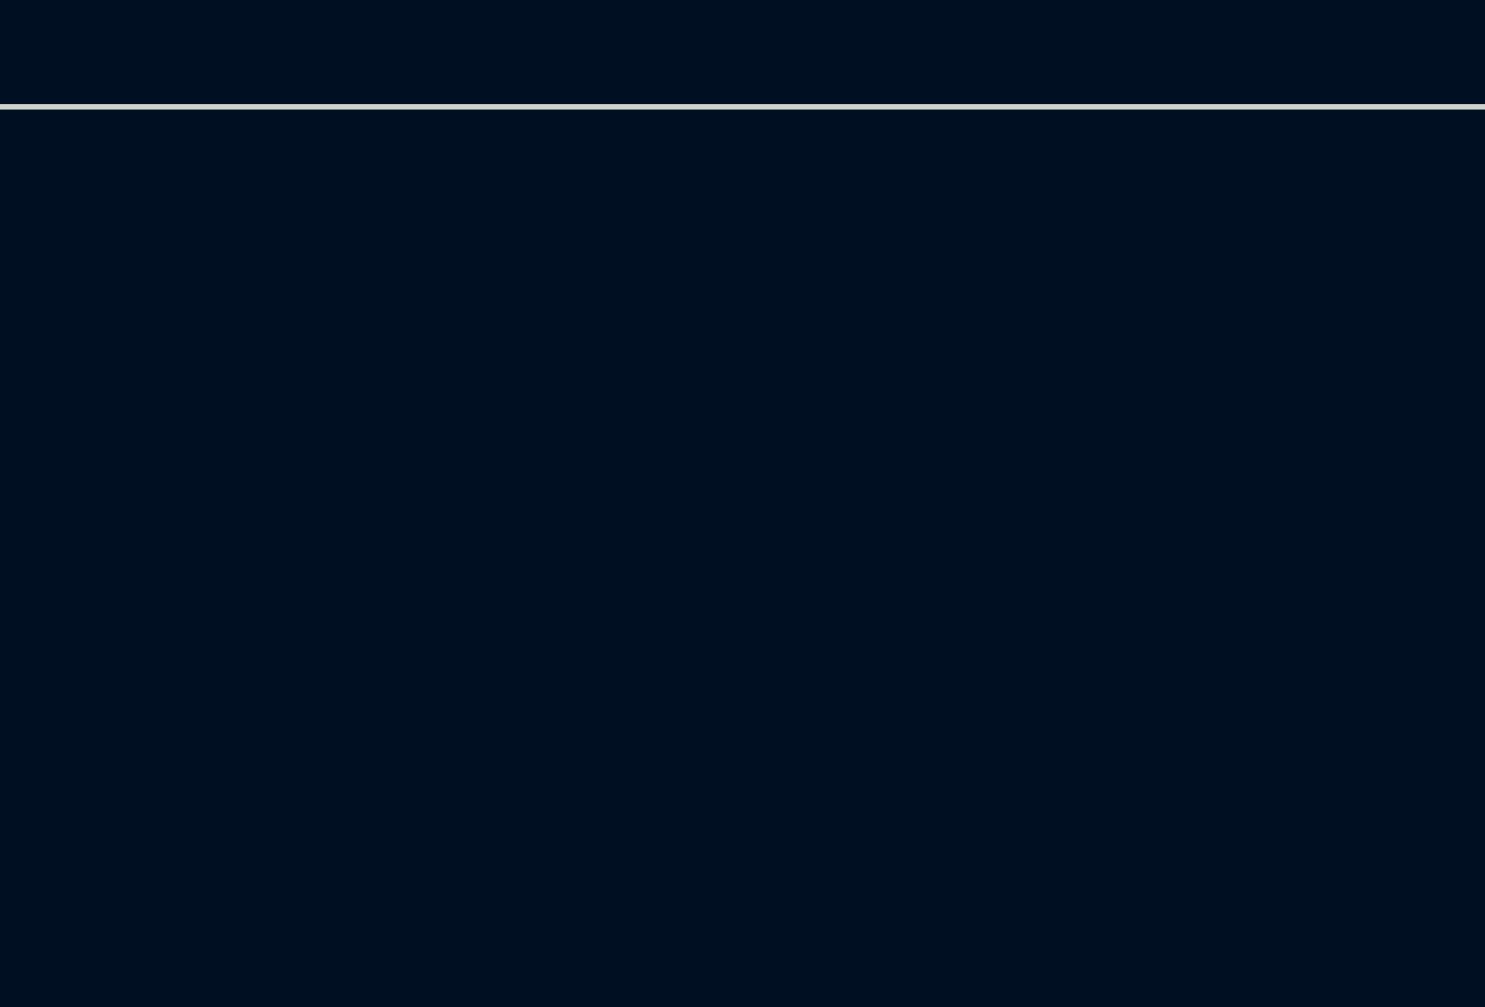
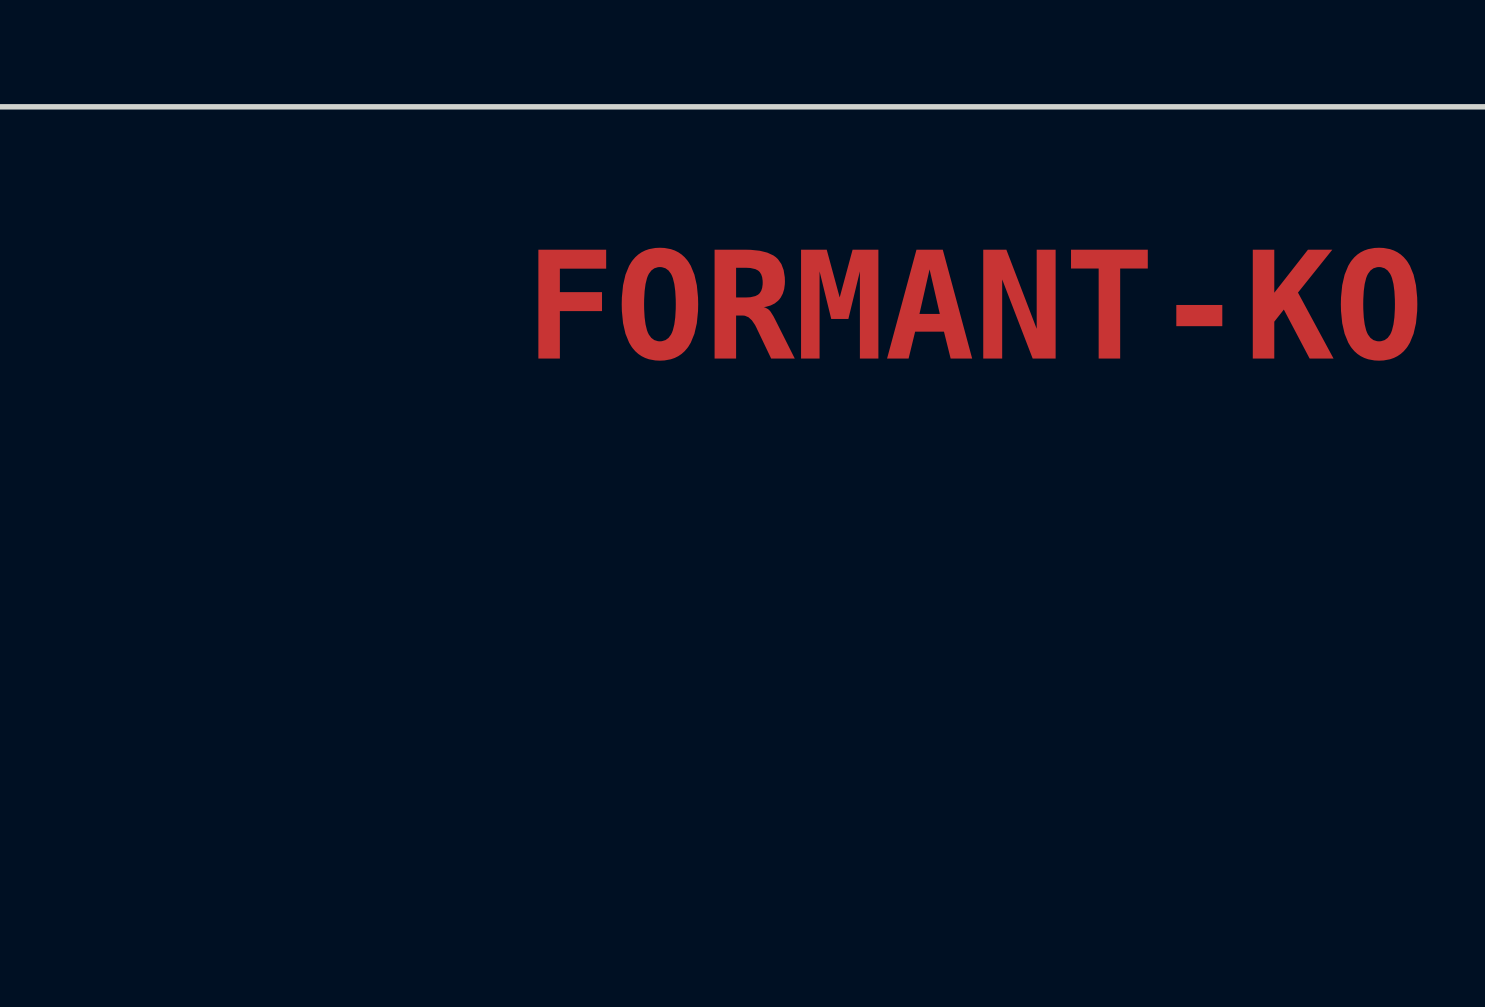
text: none -> FORMANT-KO (977, 304)

